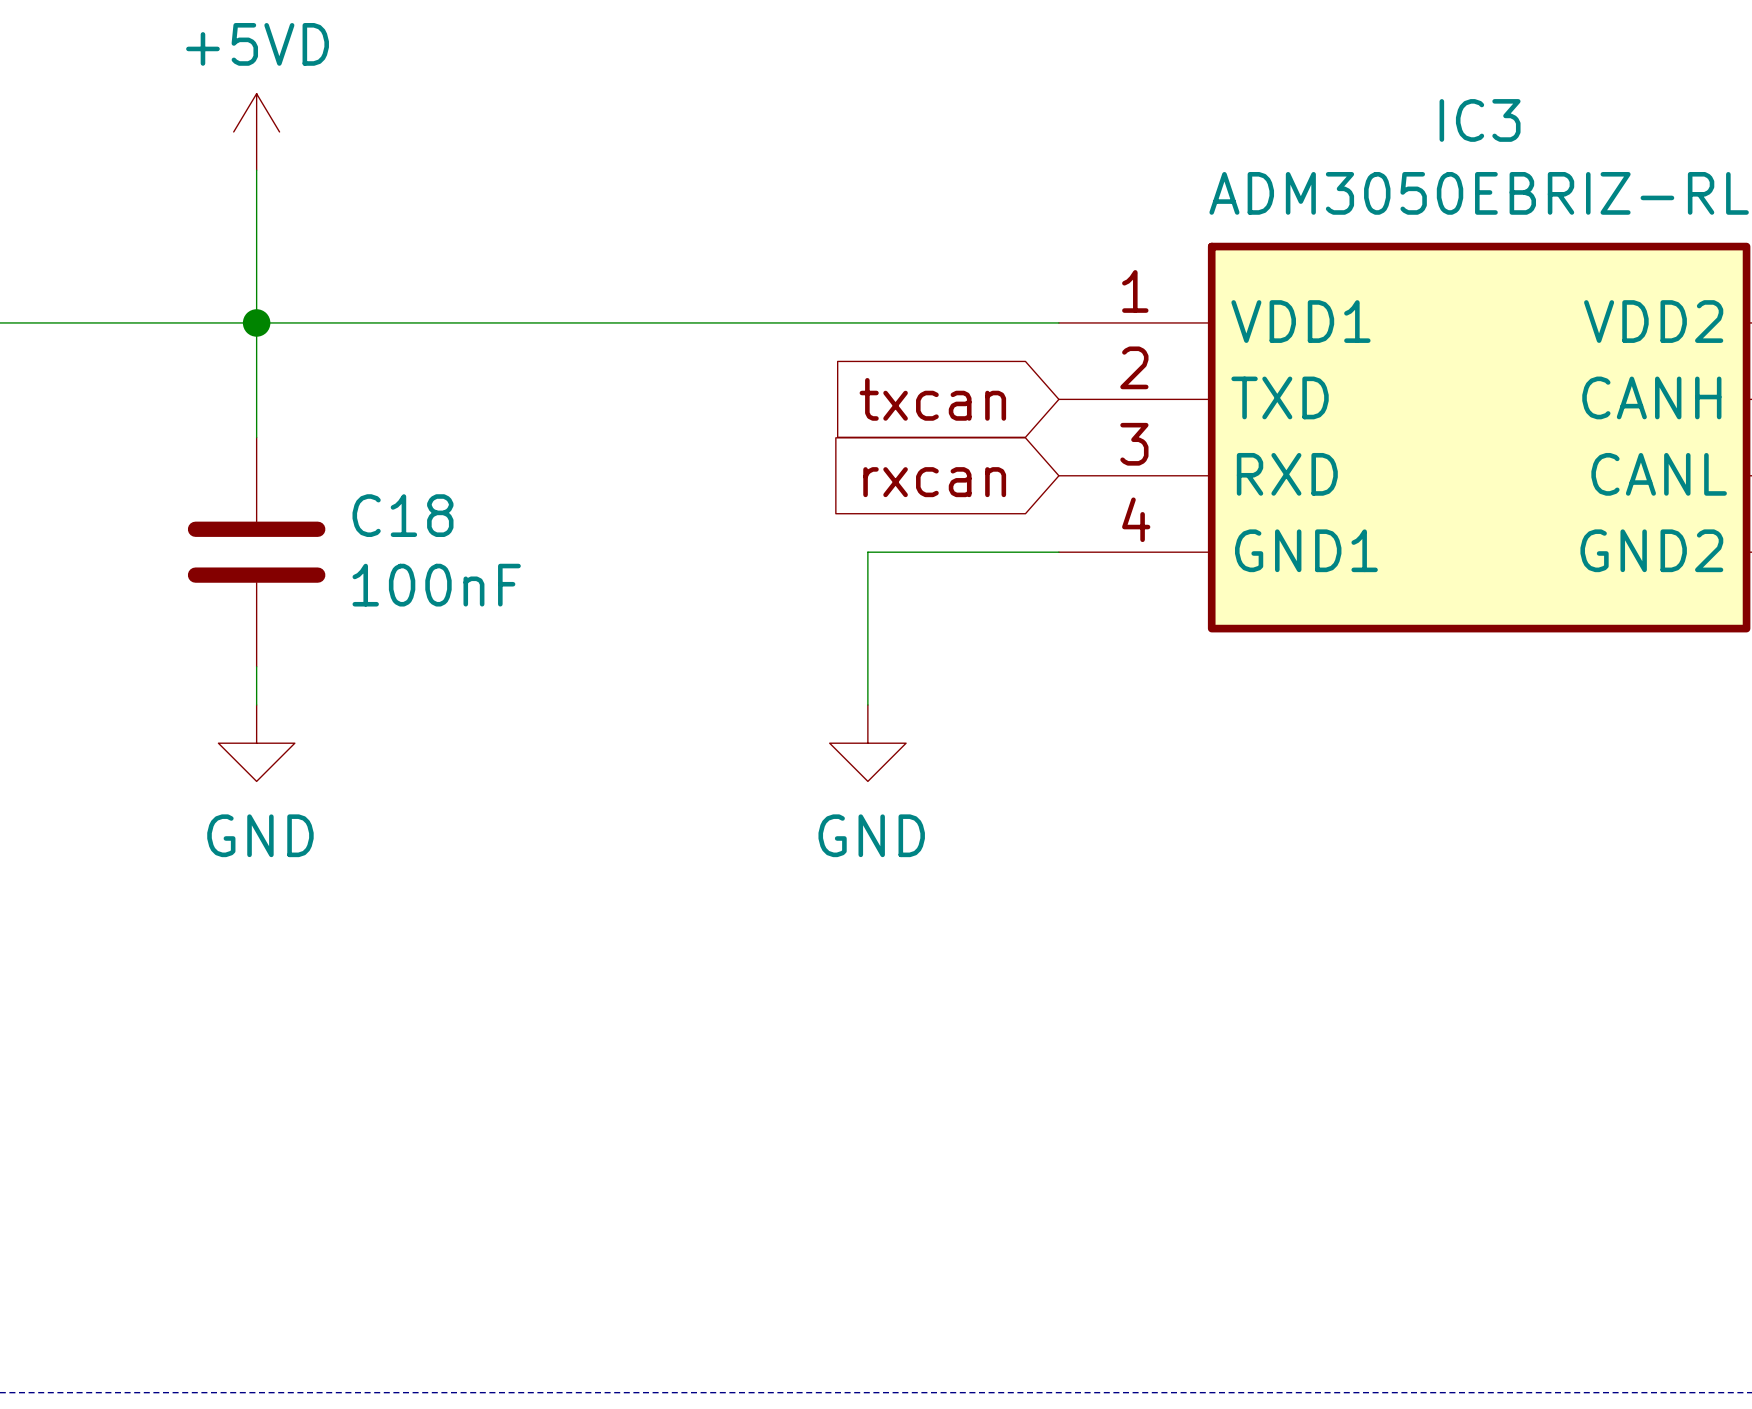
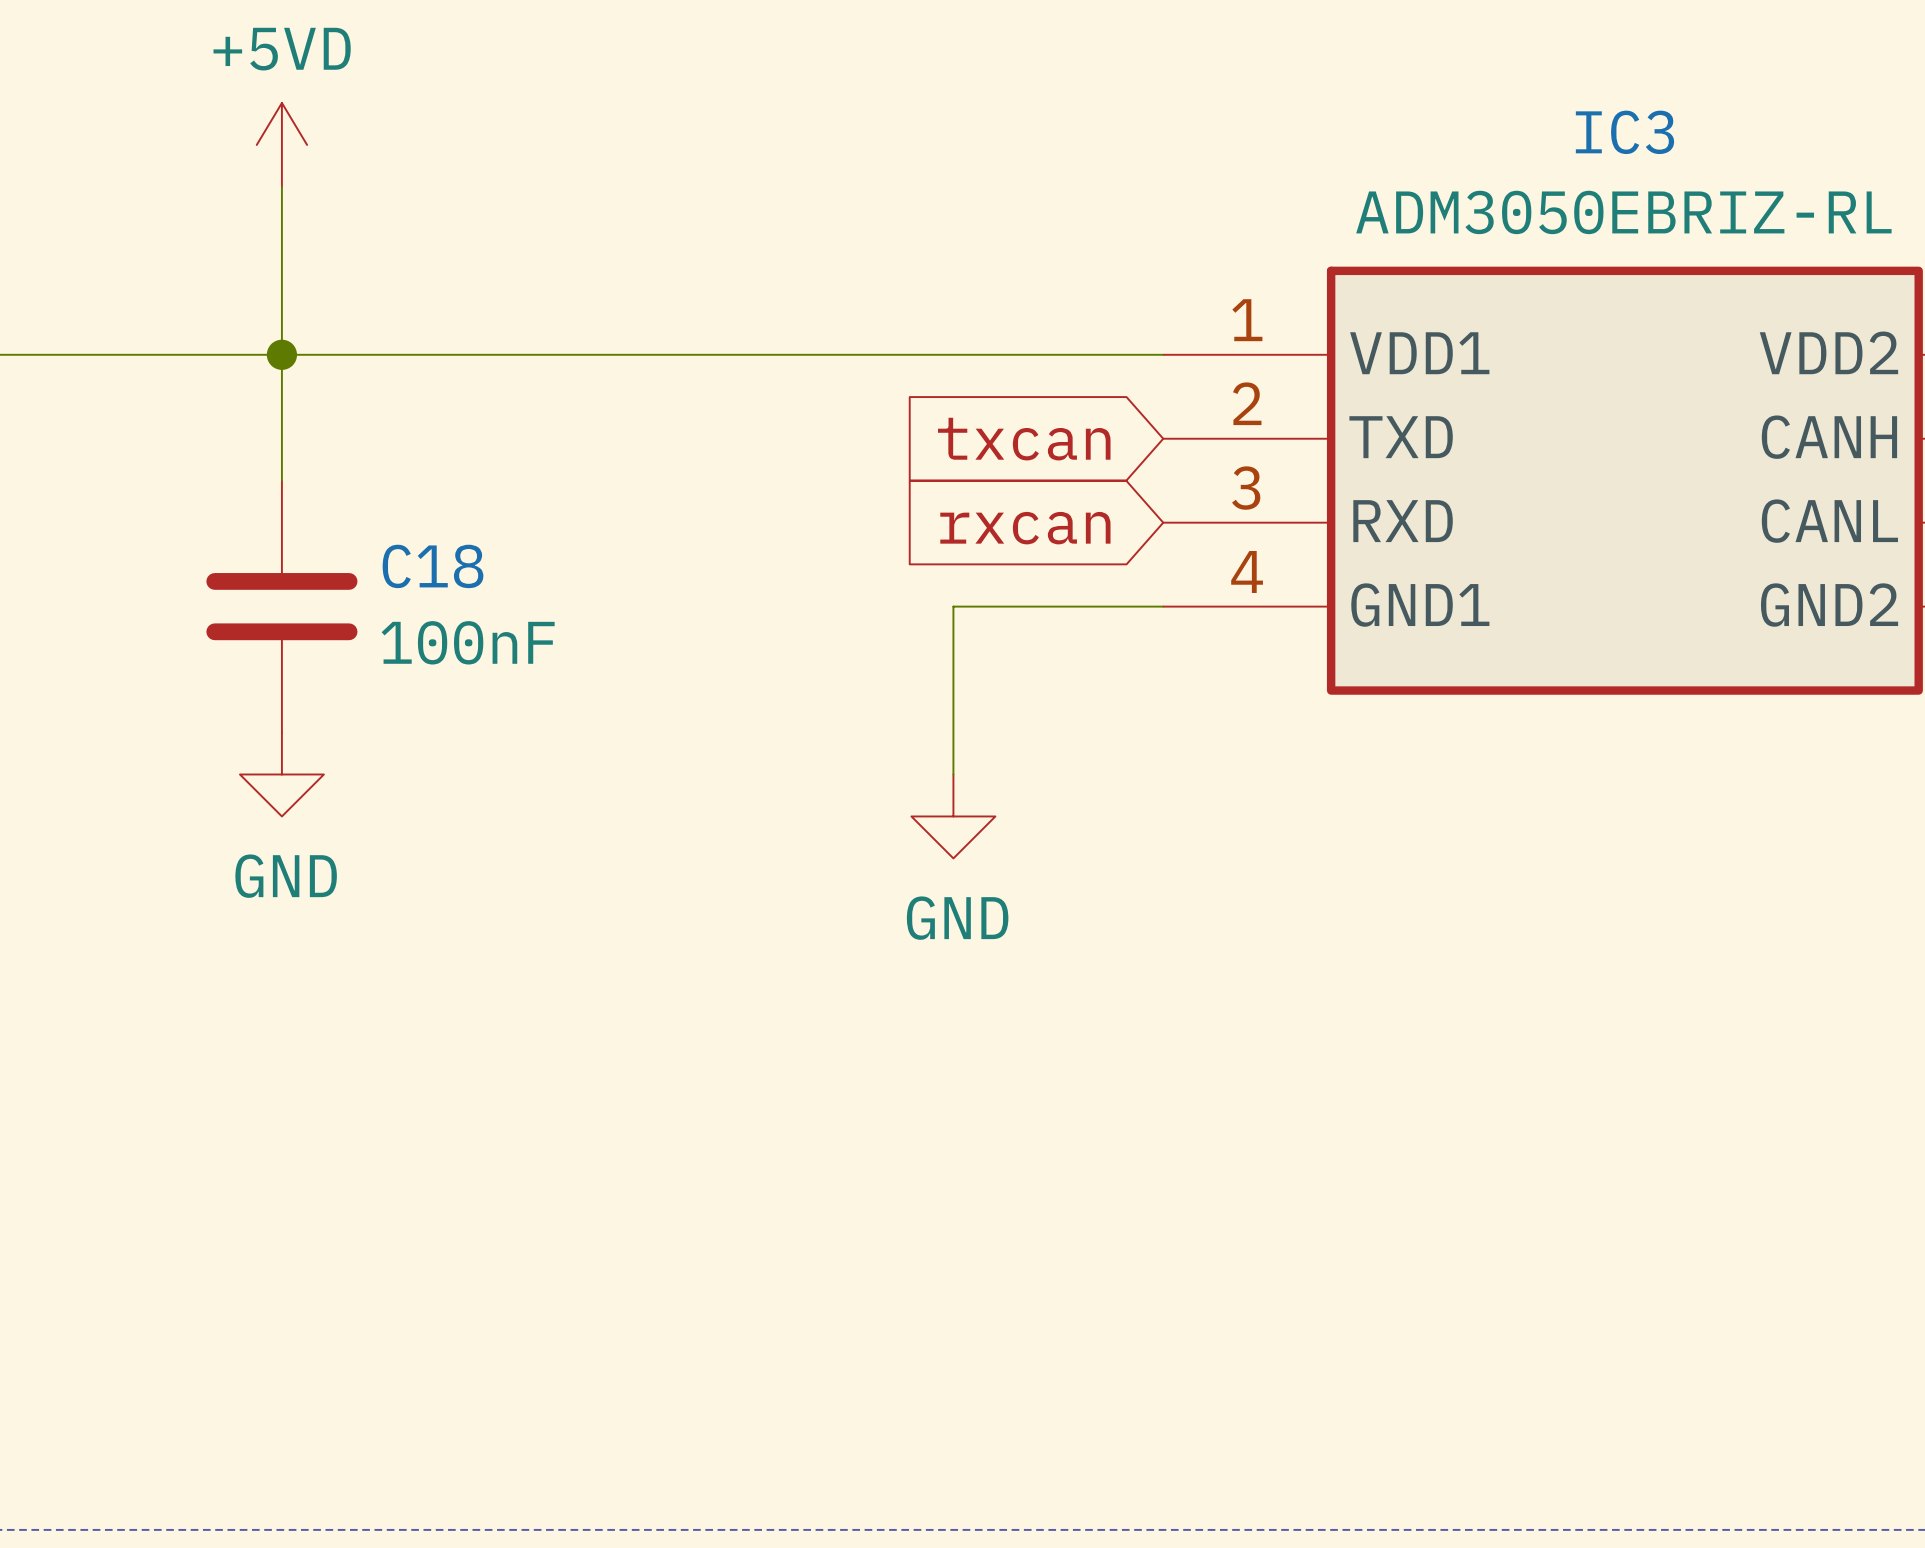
power symbol position: GND (256, 743) -> GND (281, 774)

